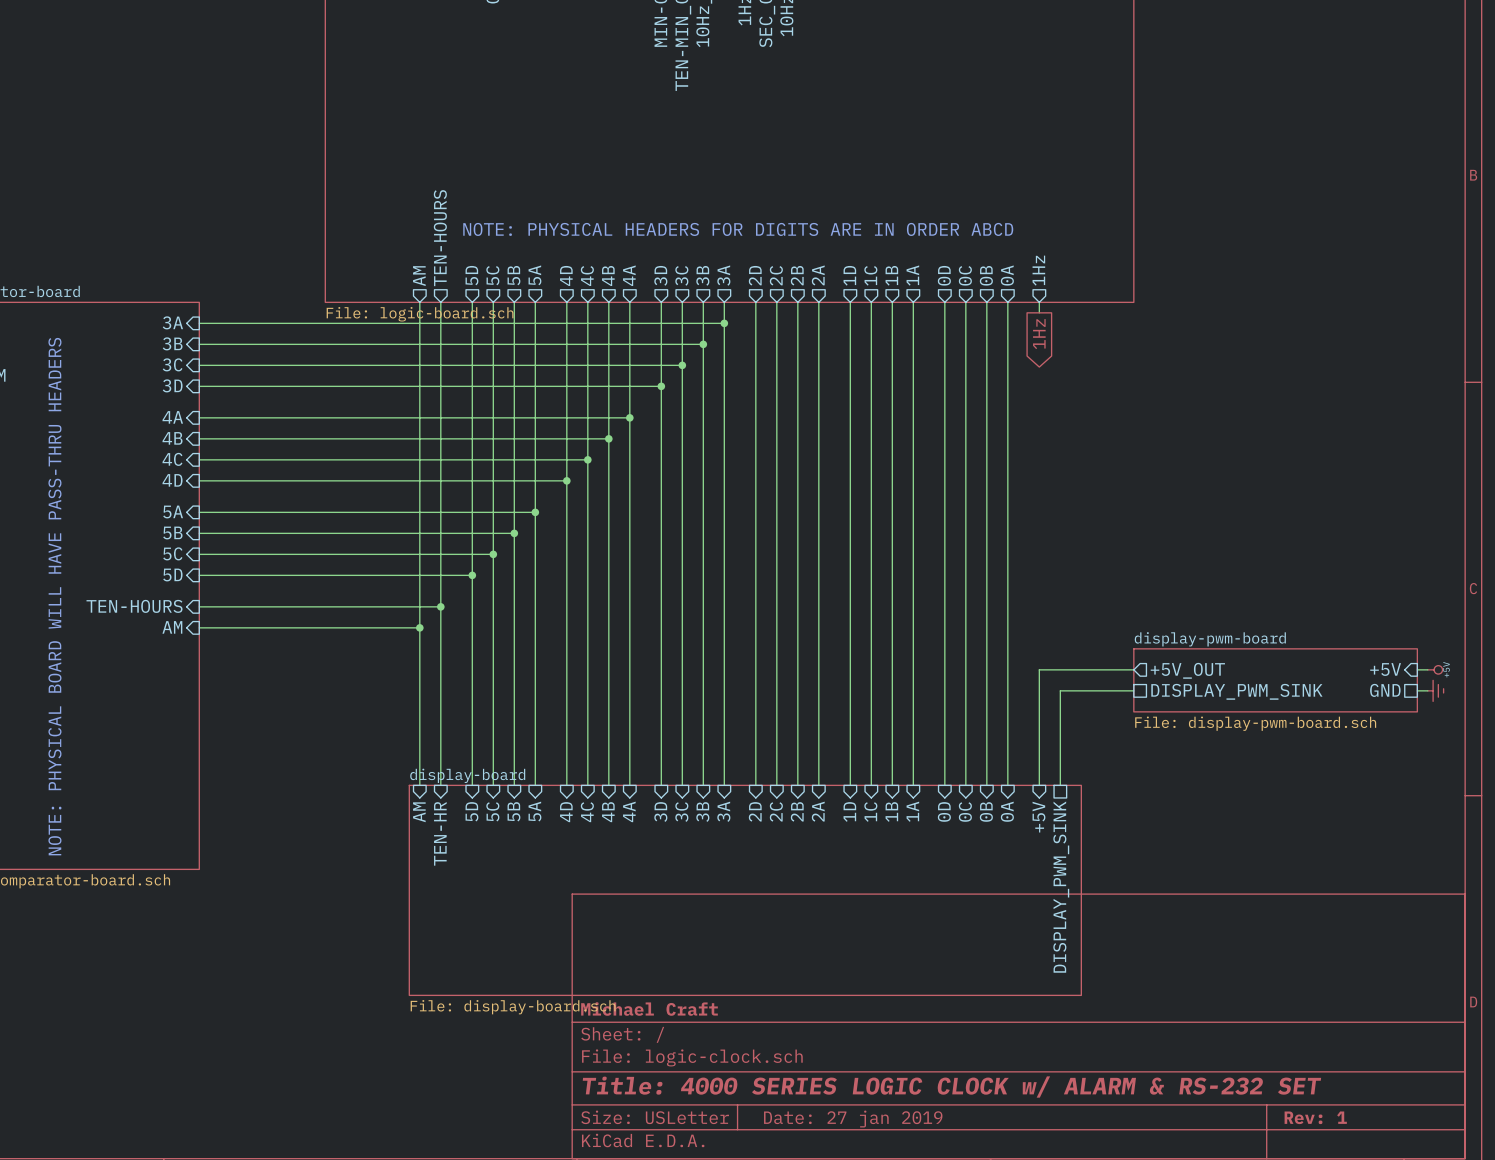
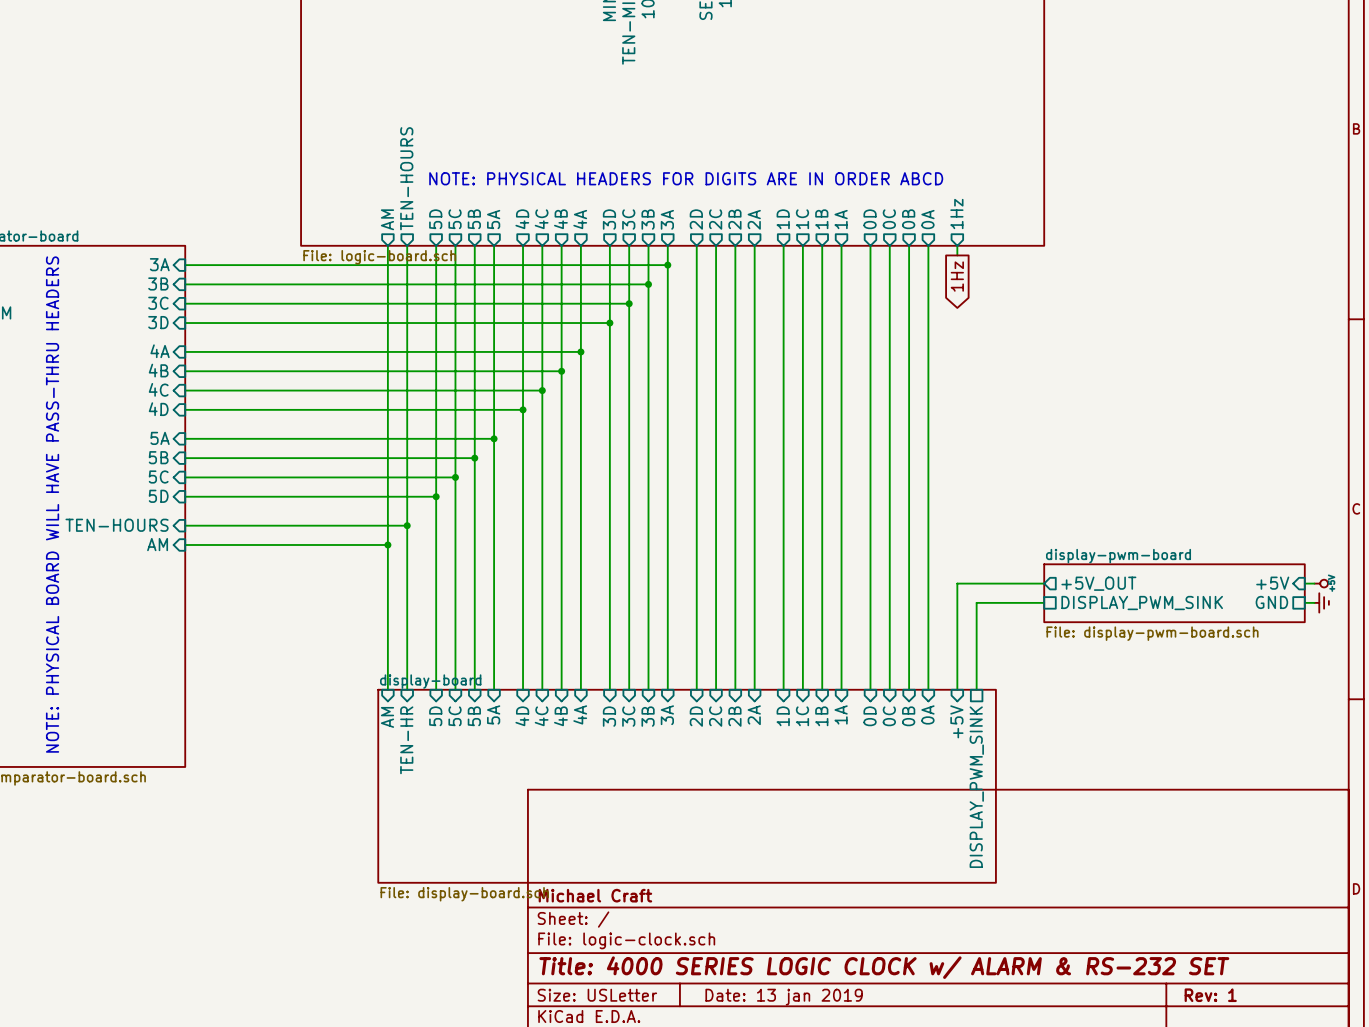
title block: Date: 27 jan 2019 (853, 1119) -> Date: 13 jan 2019 (784, 997)

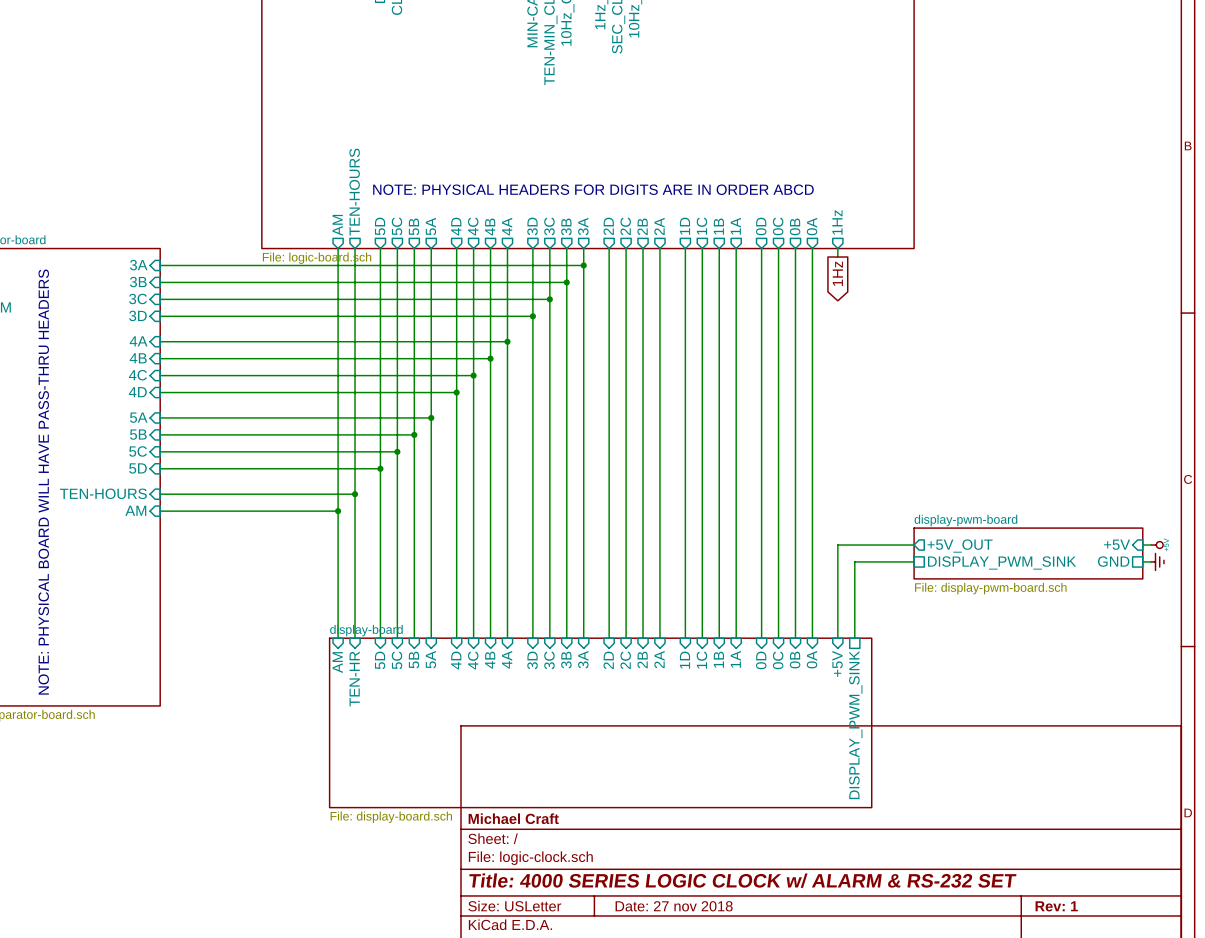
title block: Date: 13 jan 2019 (784, 997) -> Date: 27 nov 2018 (674, 906)

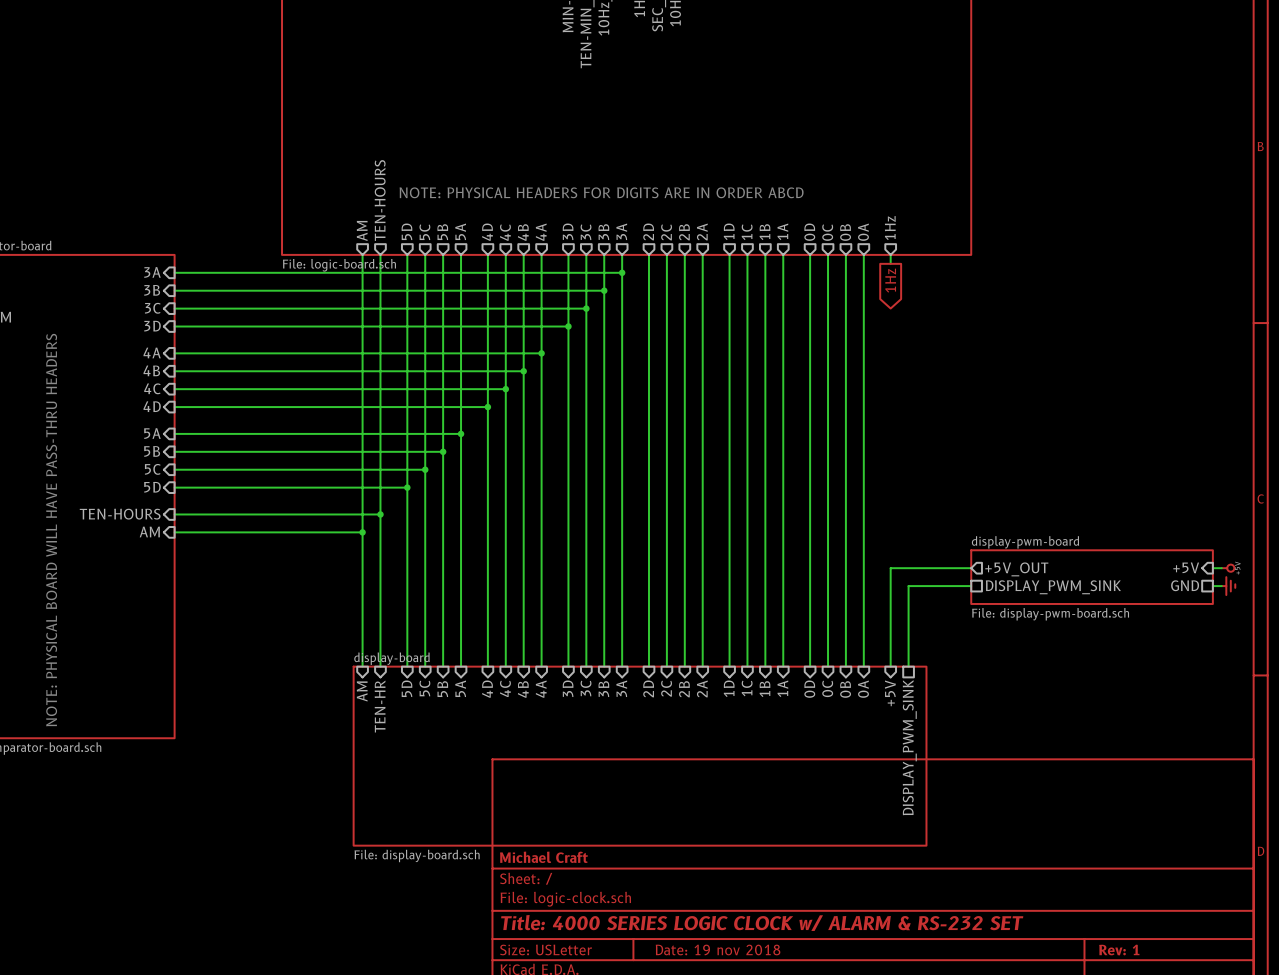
title block: Date: 27 nov 2018 (674, 906) -> Date: 19 nov 2018 (718, 949)

